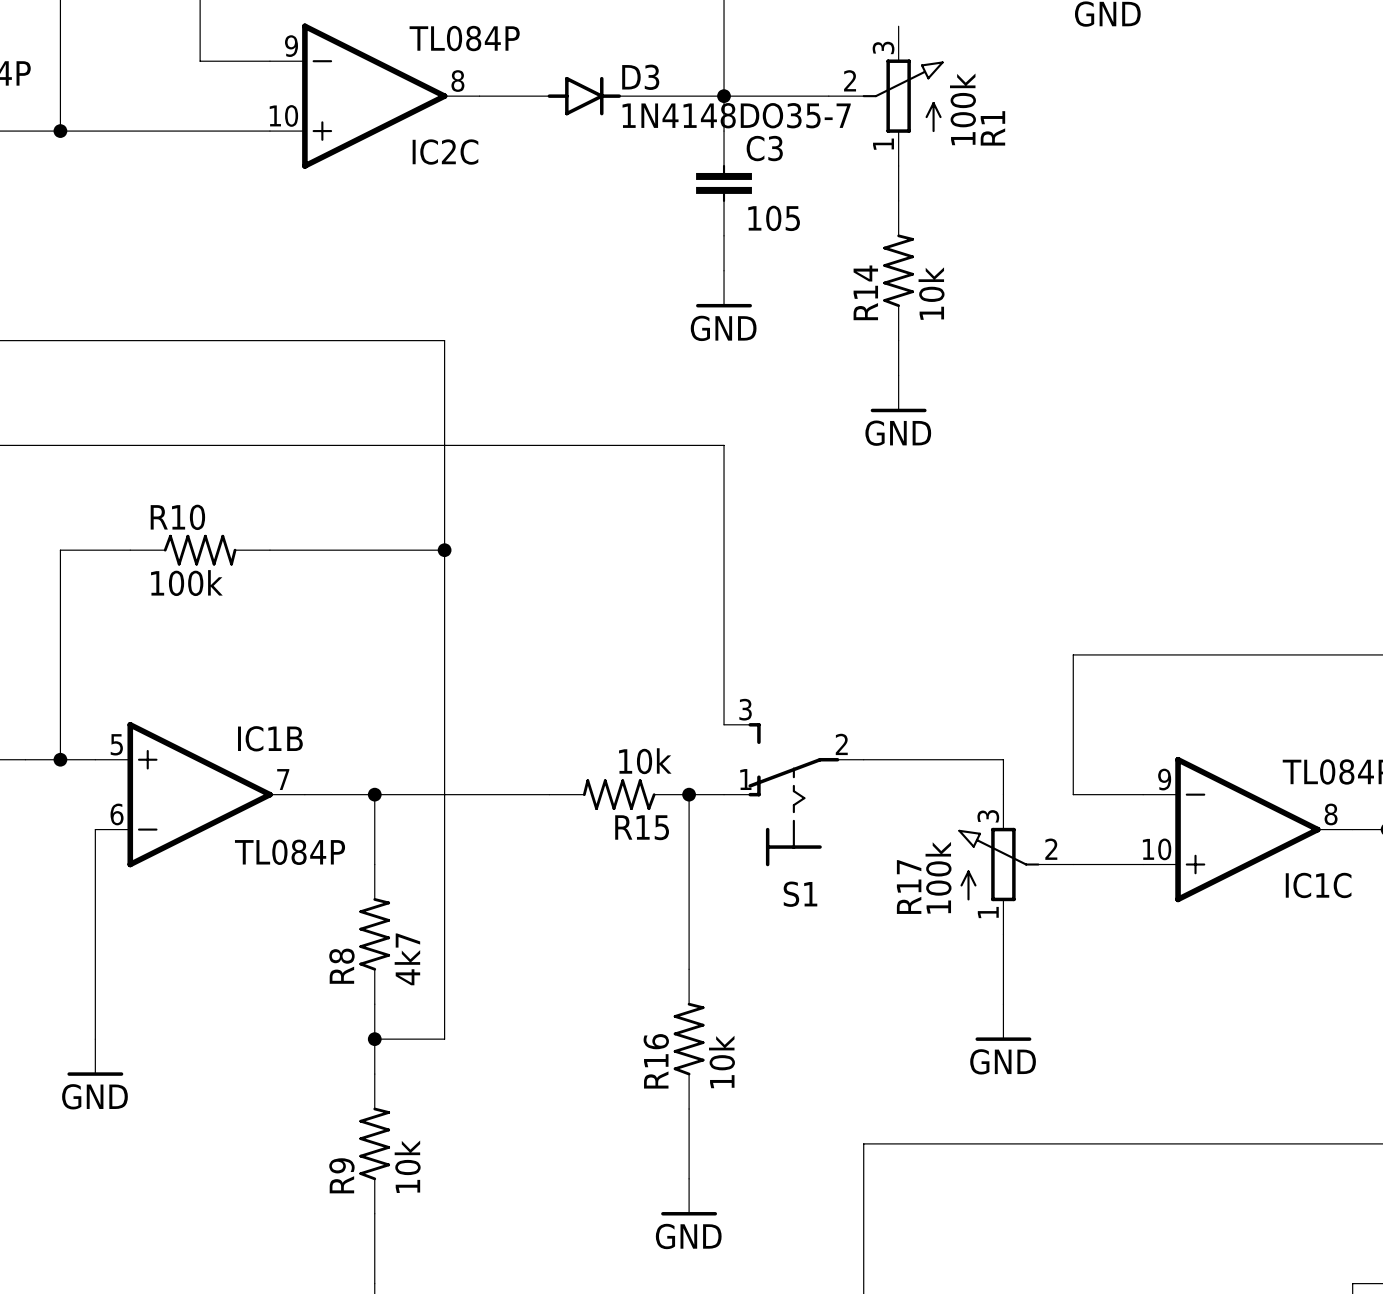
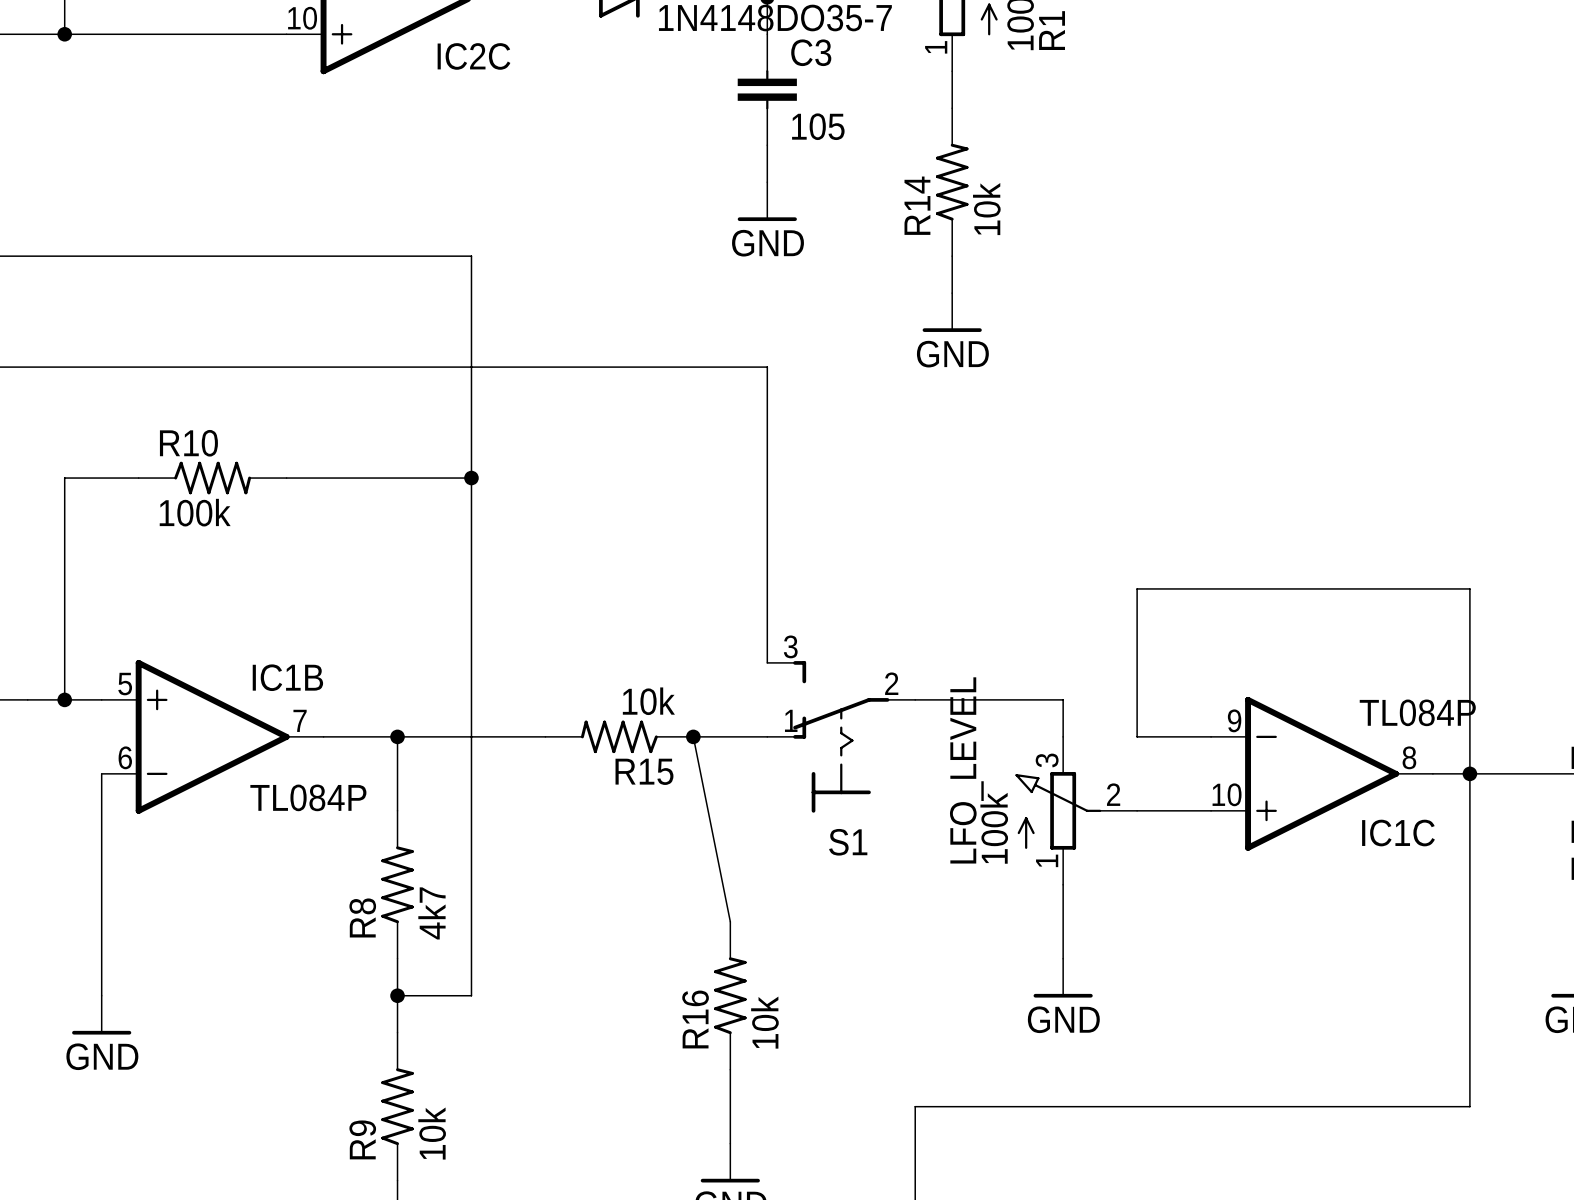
R15 position: (619, 794) -> (619, 736)
wire: (689, 794) (689, 969) -> (730, 736) (693, 736) (730, 921)
junction position: (689, 794) -> (693, 736)
R17 name: R17 (909, 887) -> LFO_LEVEL (966, 770)

